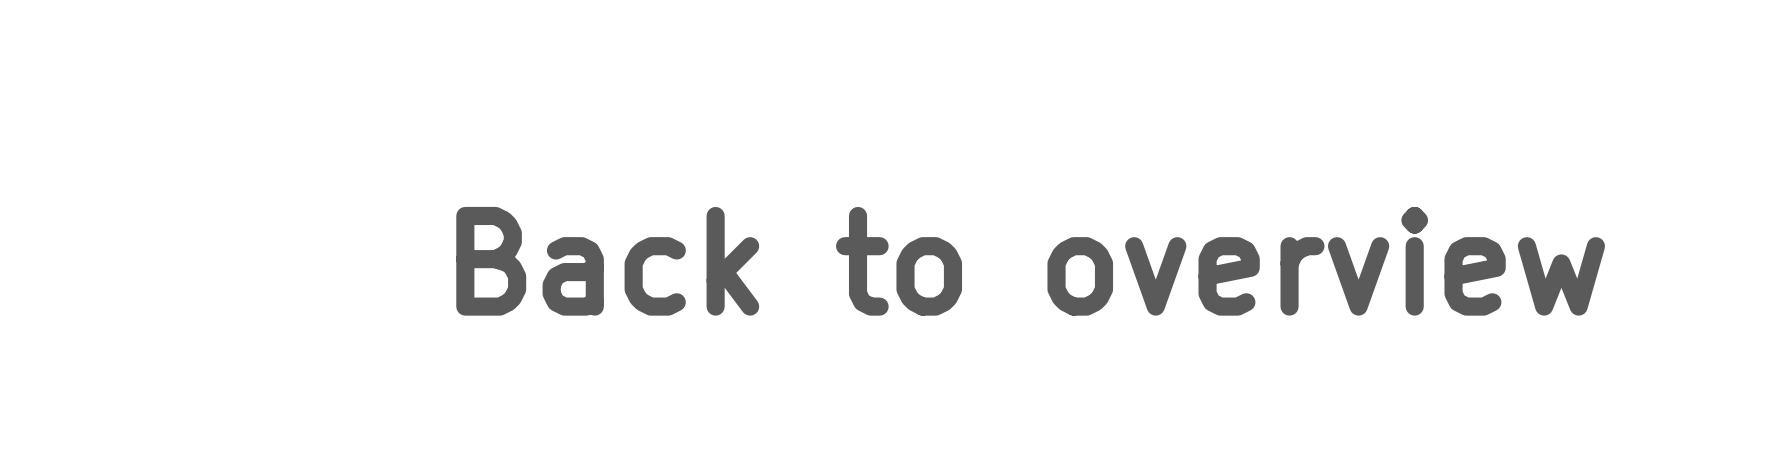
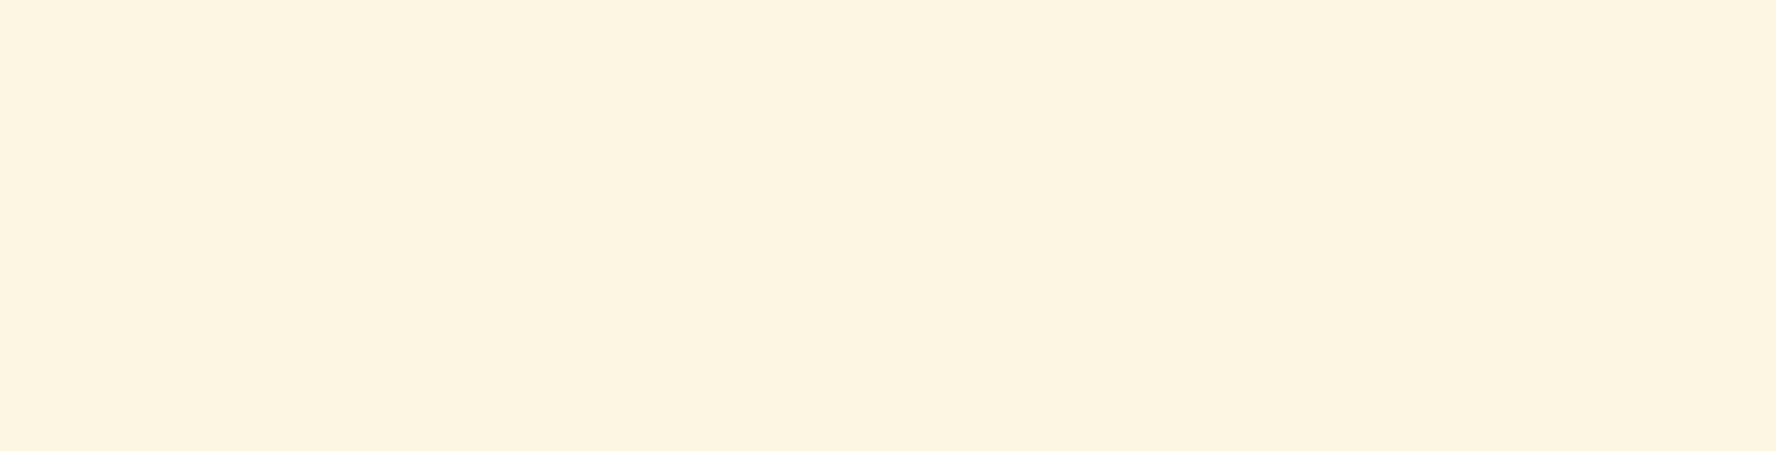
text: Back to overview (1030, 261) -> none

